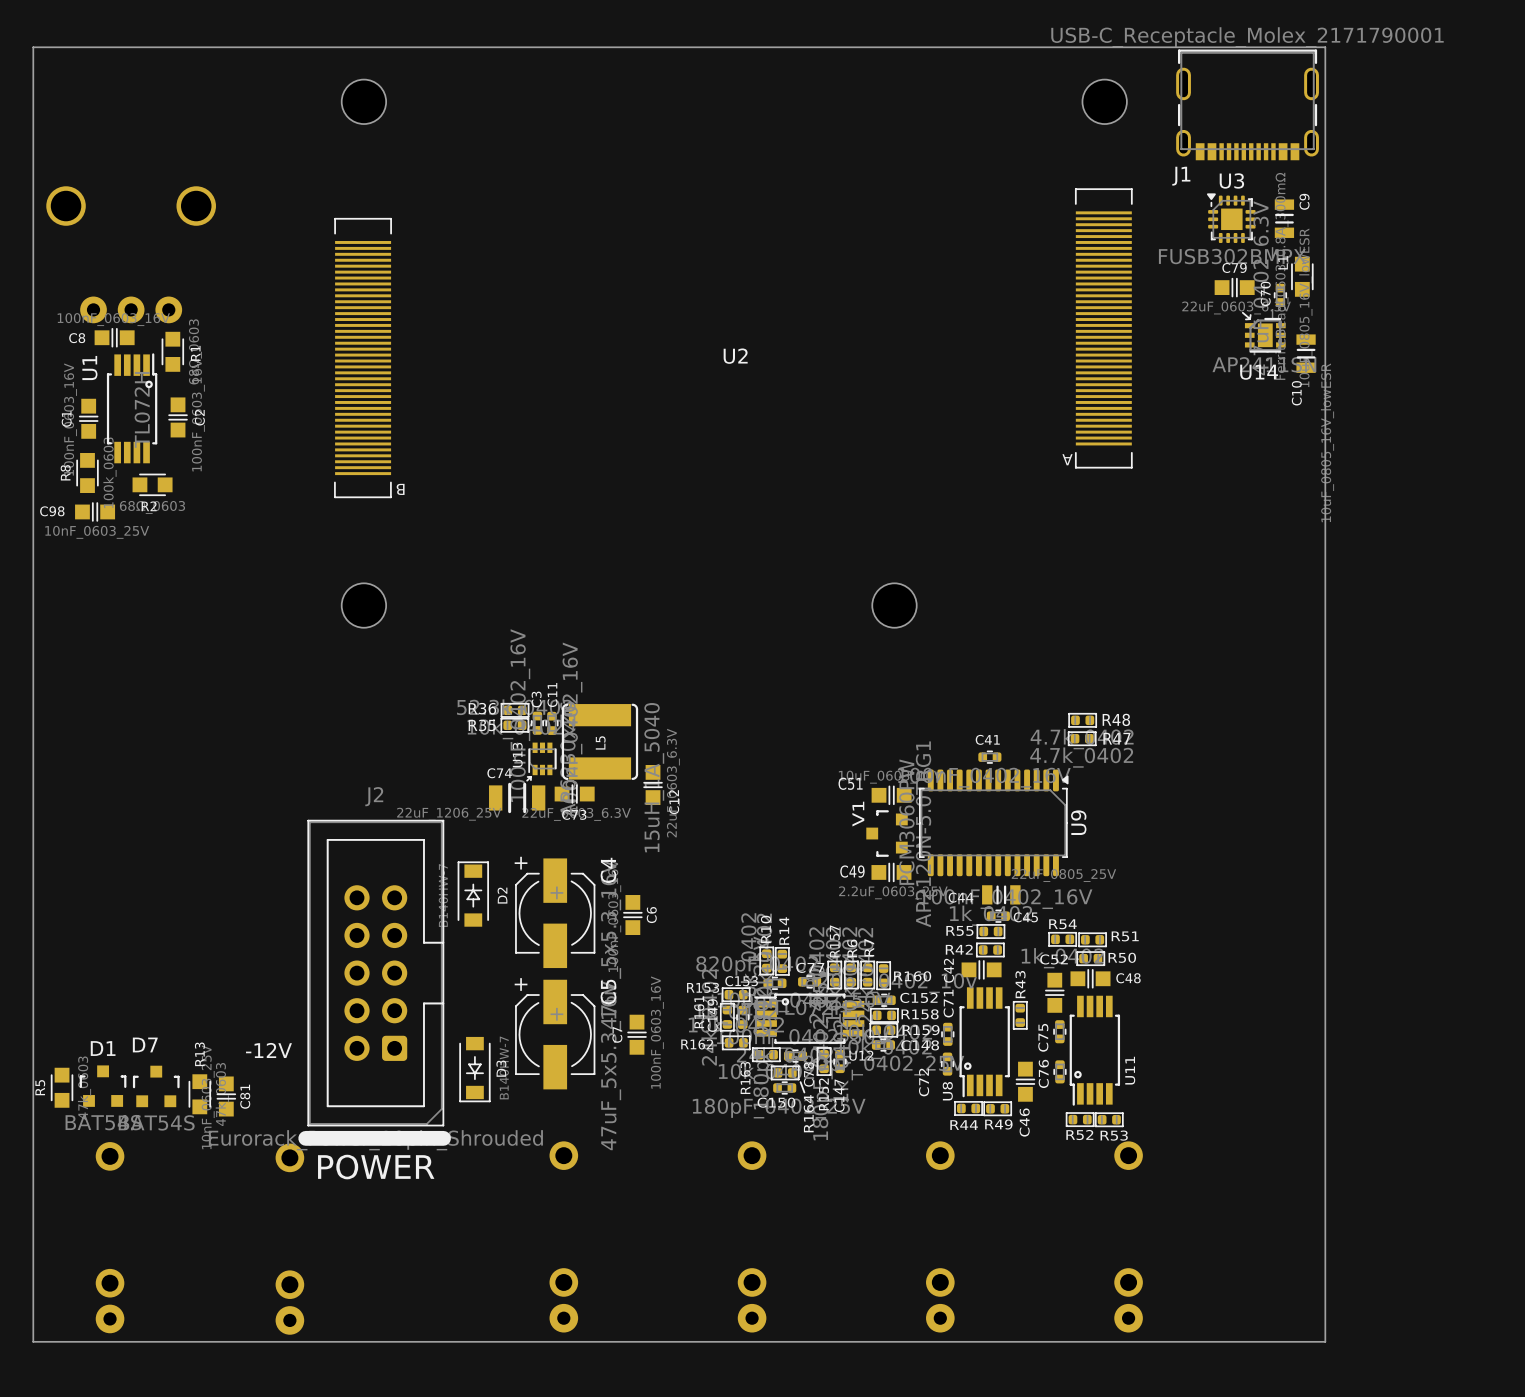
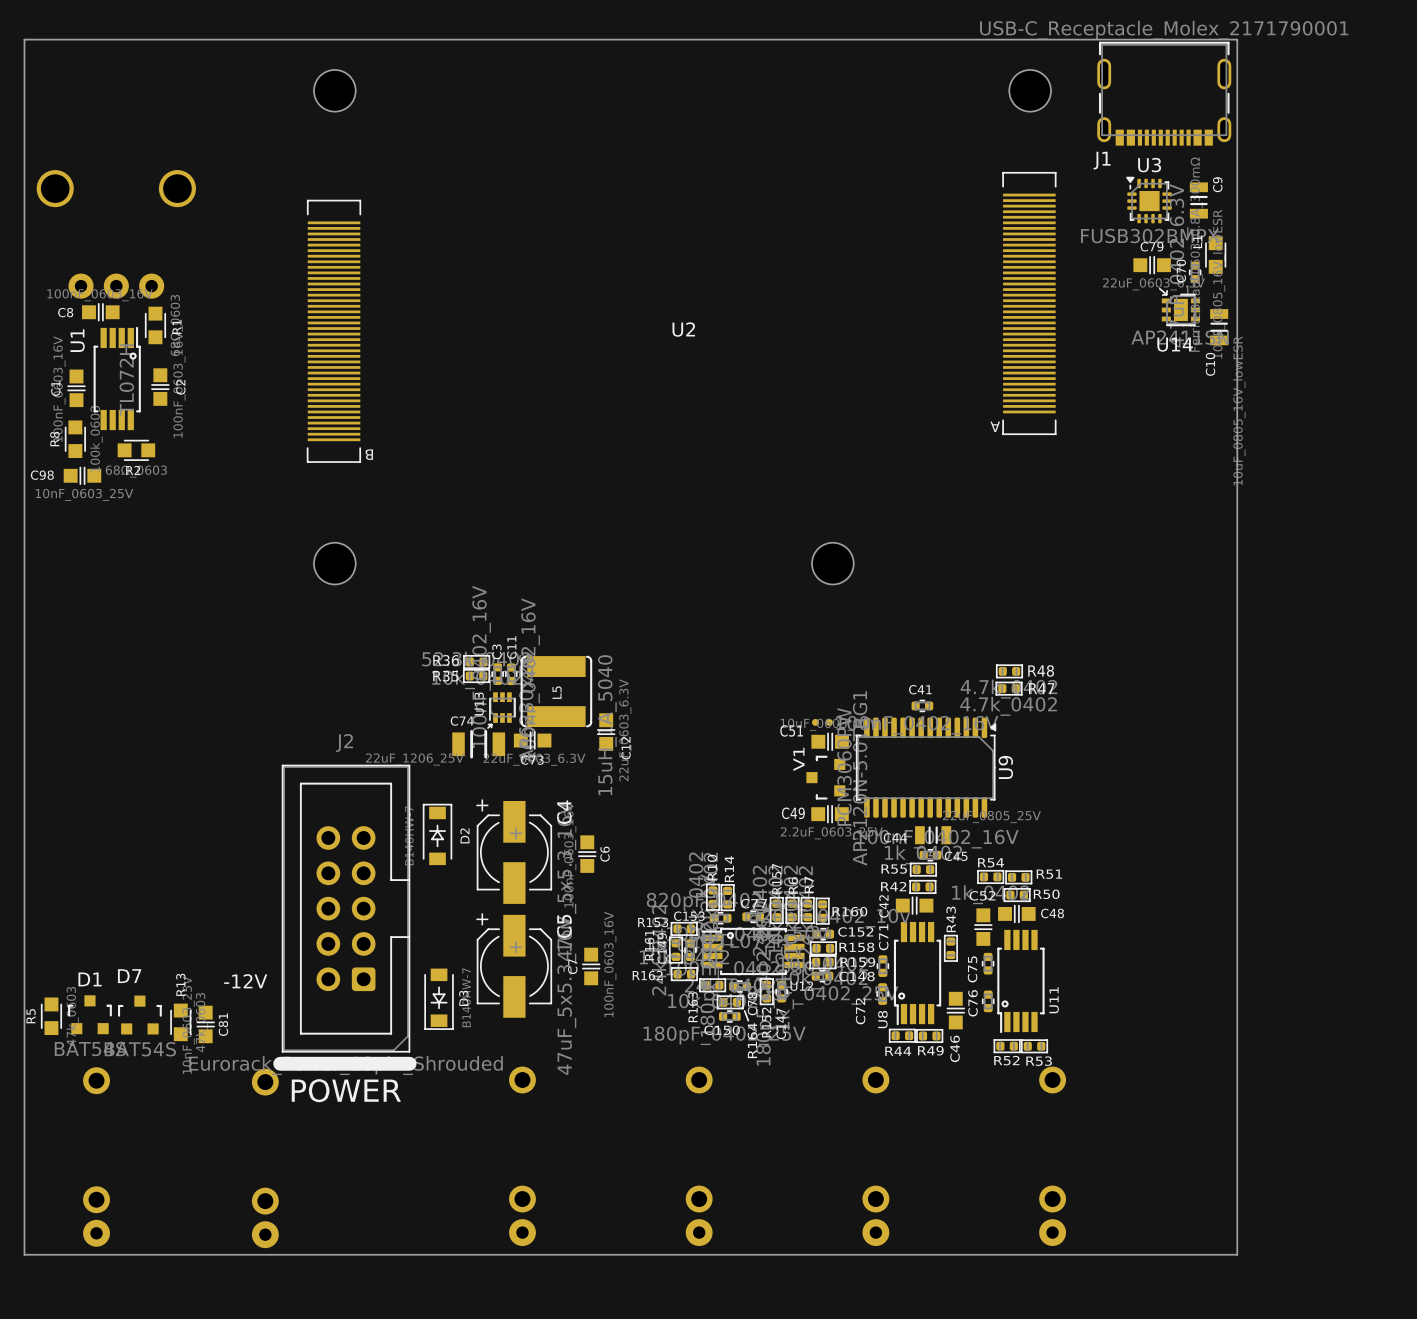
part: none -> (822, 722)

